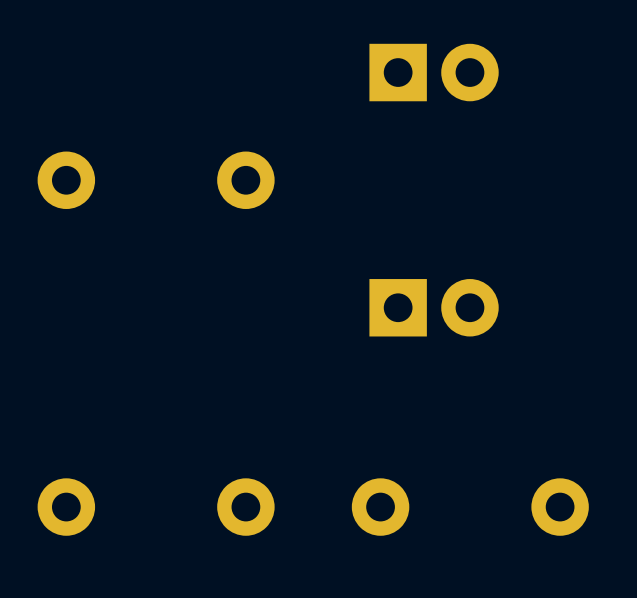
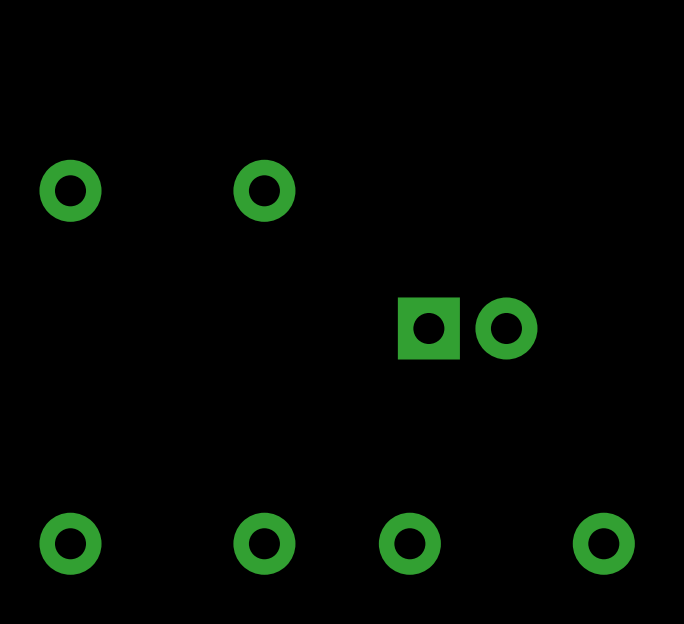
part: (434, 72) -> none

